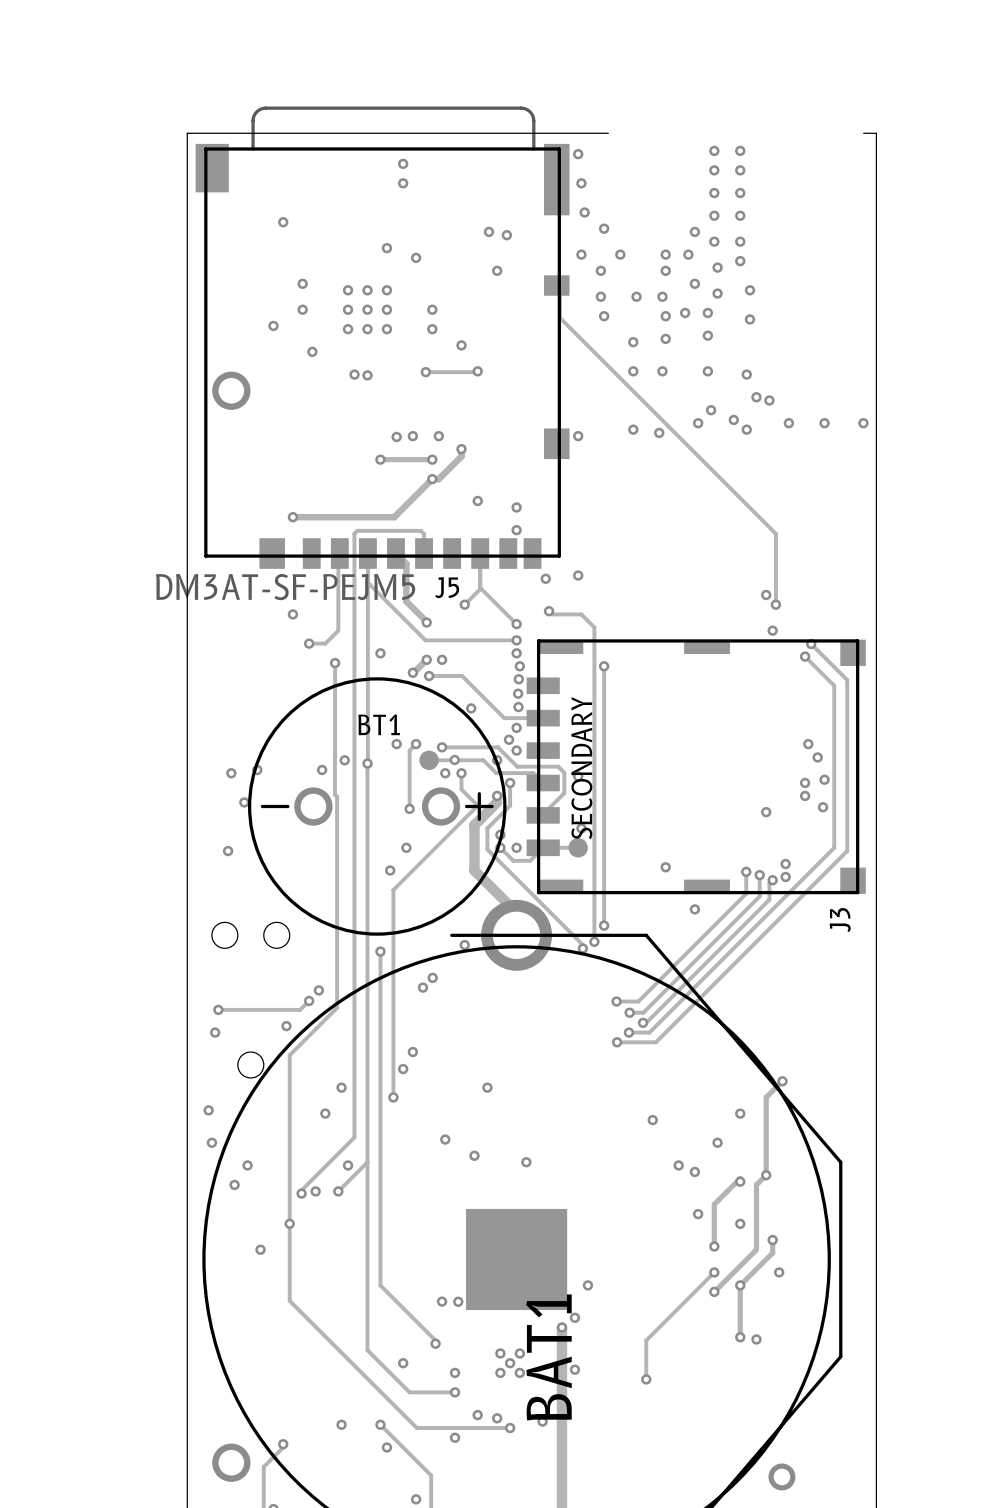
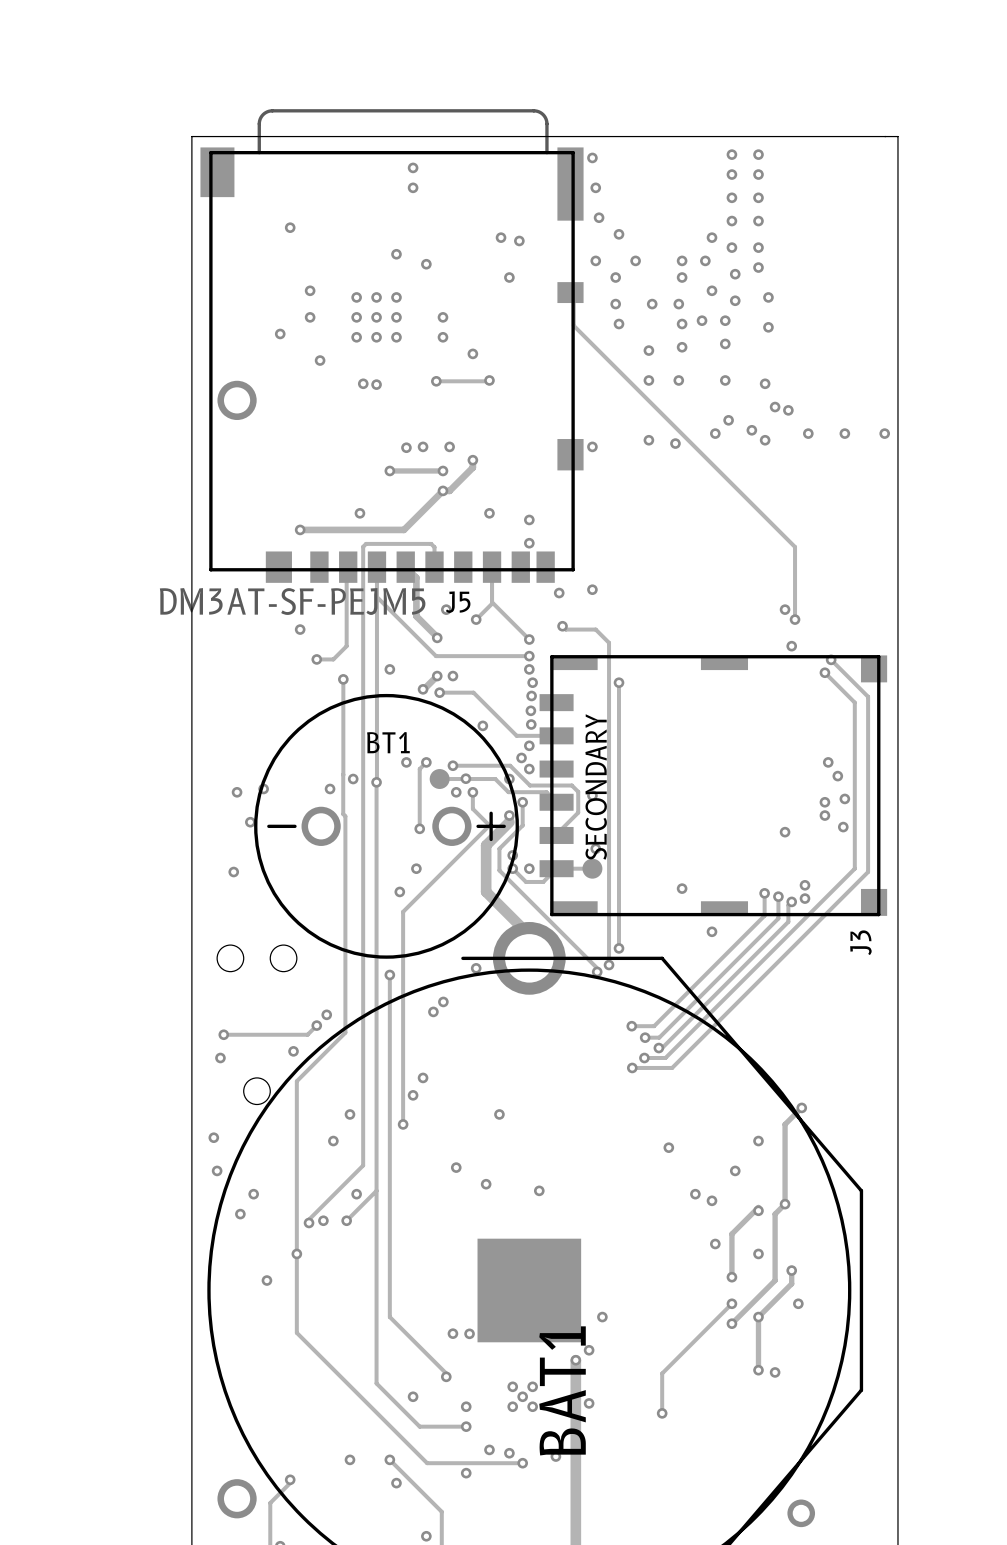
board edge: none -> (884, 136) (623, 136)
via: none -> (359, 513)
via: none -> (446, 609)

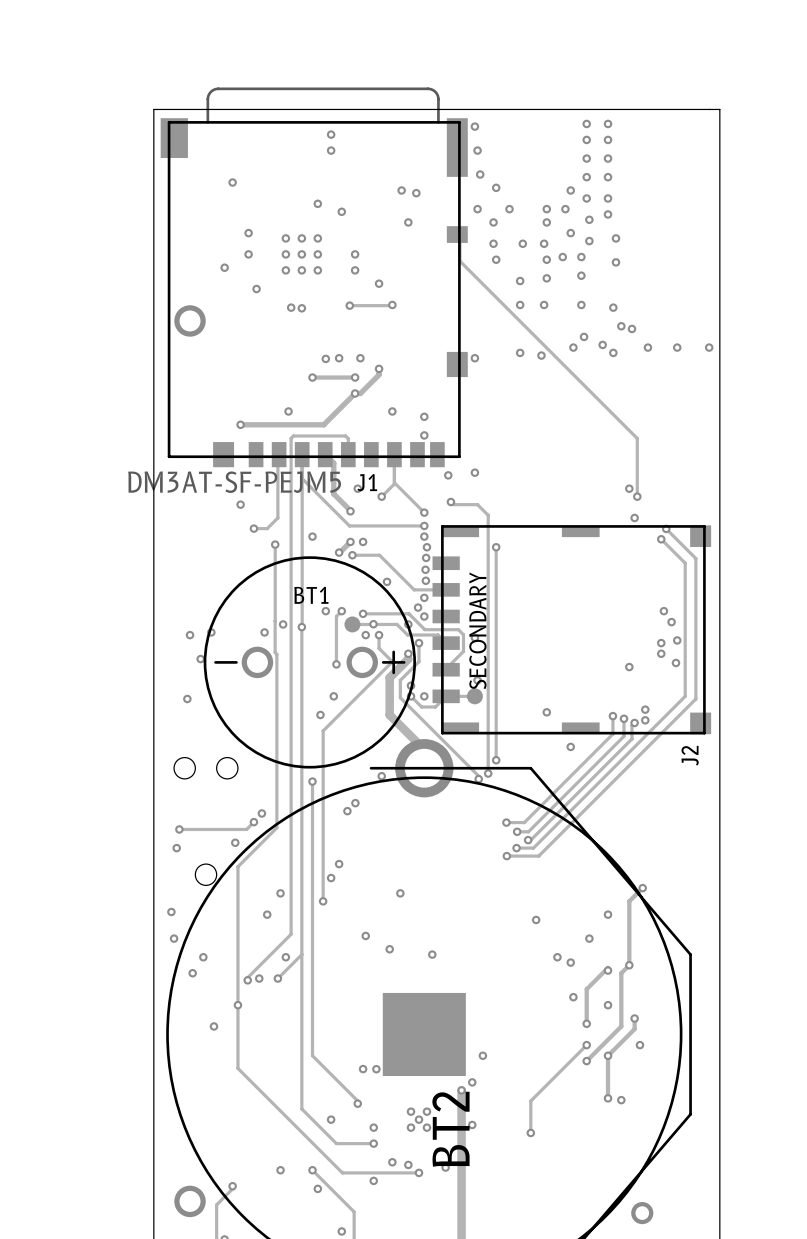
J5 name: J5 (458, 602) -> J1 (367, 482)
J3 name: J3 (860, 942) -> J2 (690, 755)
BAT1 name: BAT1 (562, 1390) -> BT2 (450, 1129)

